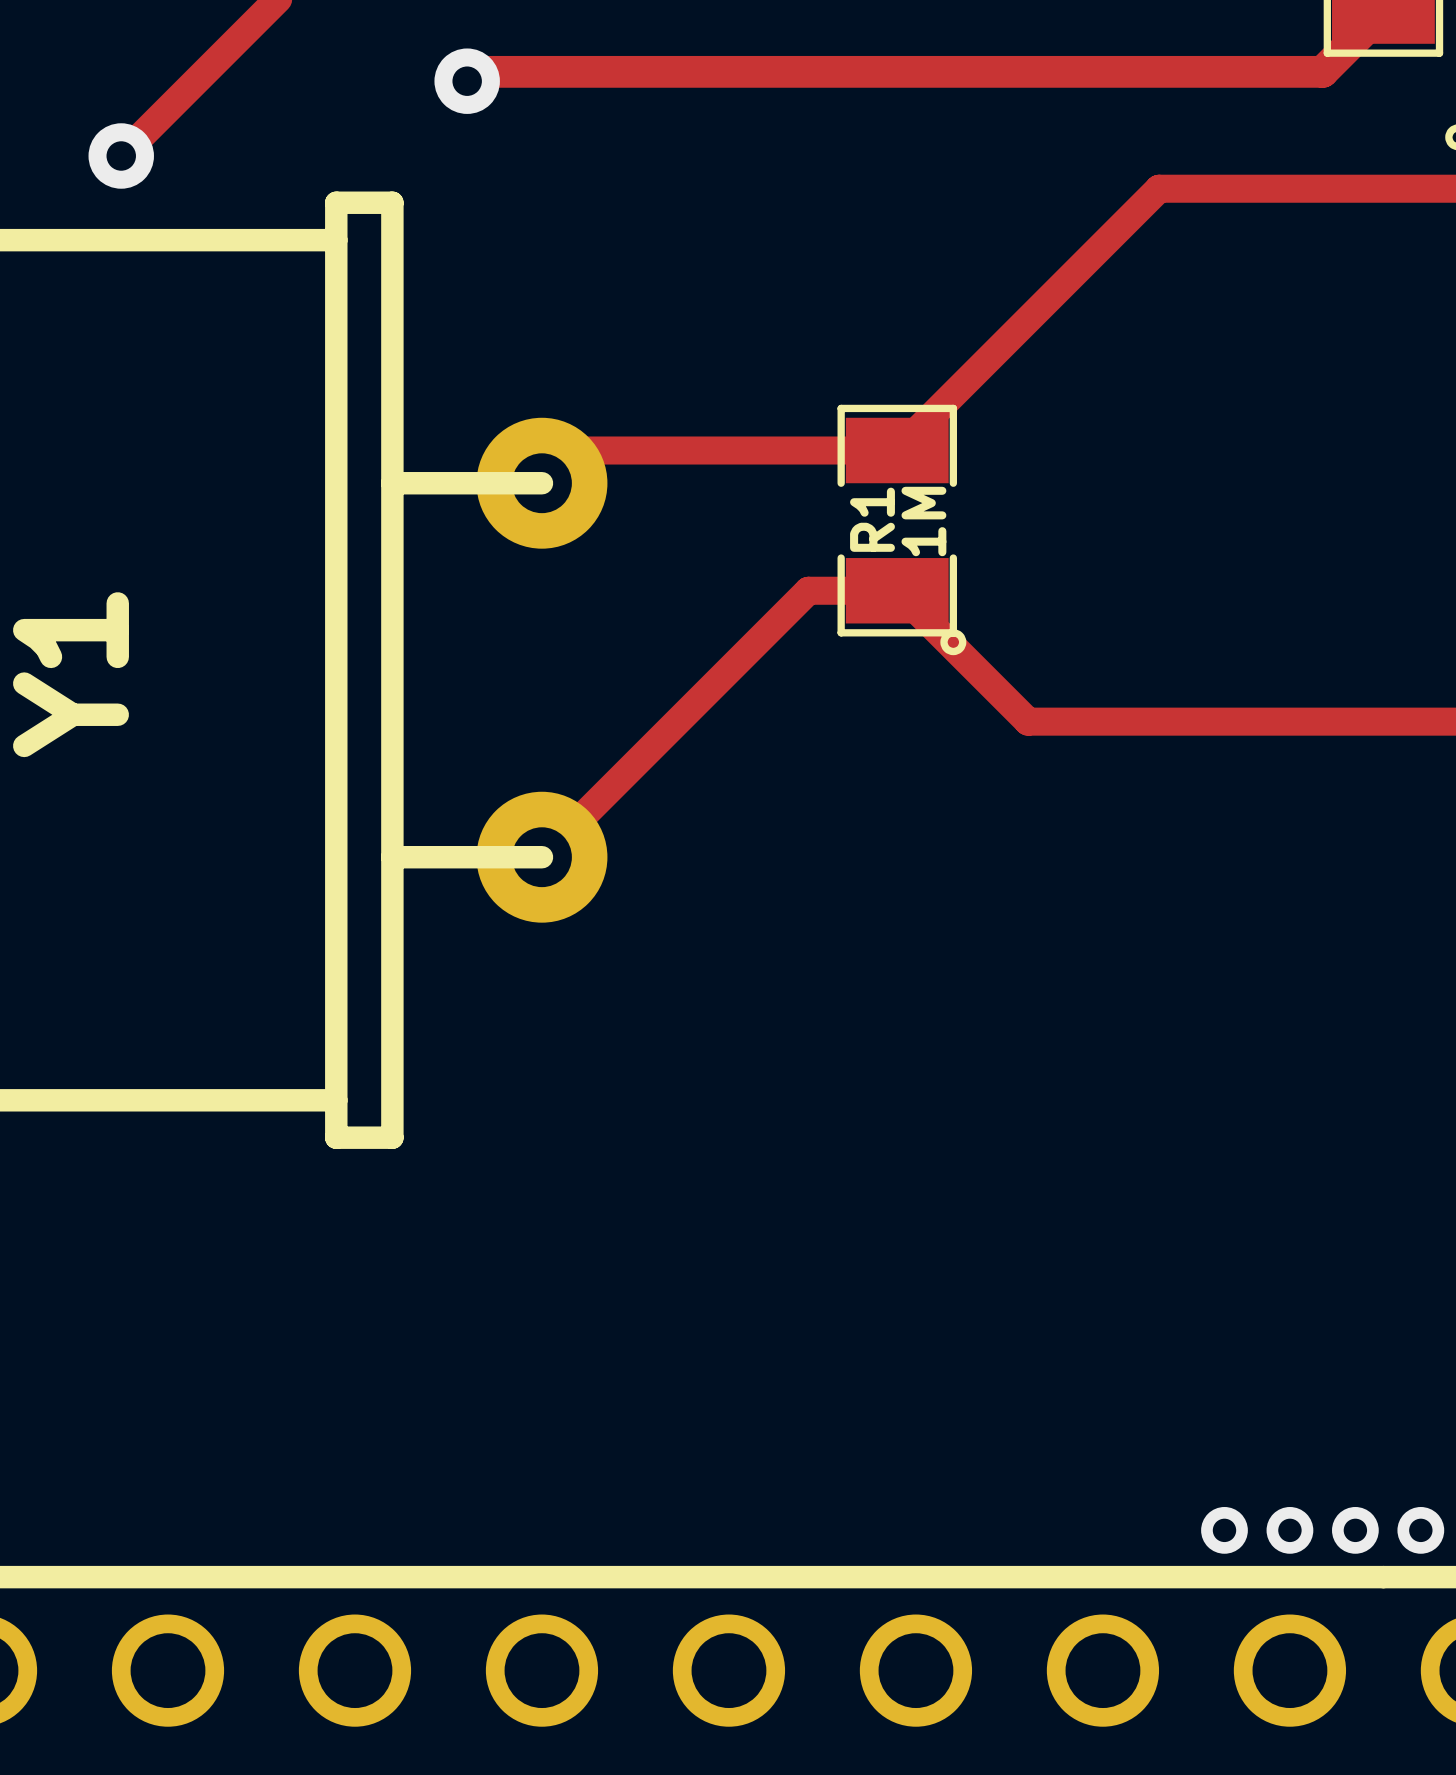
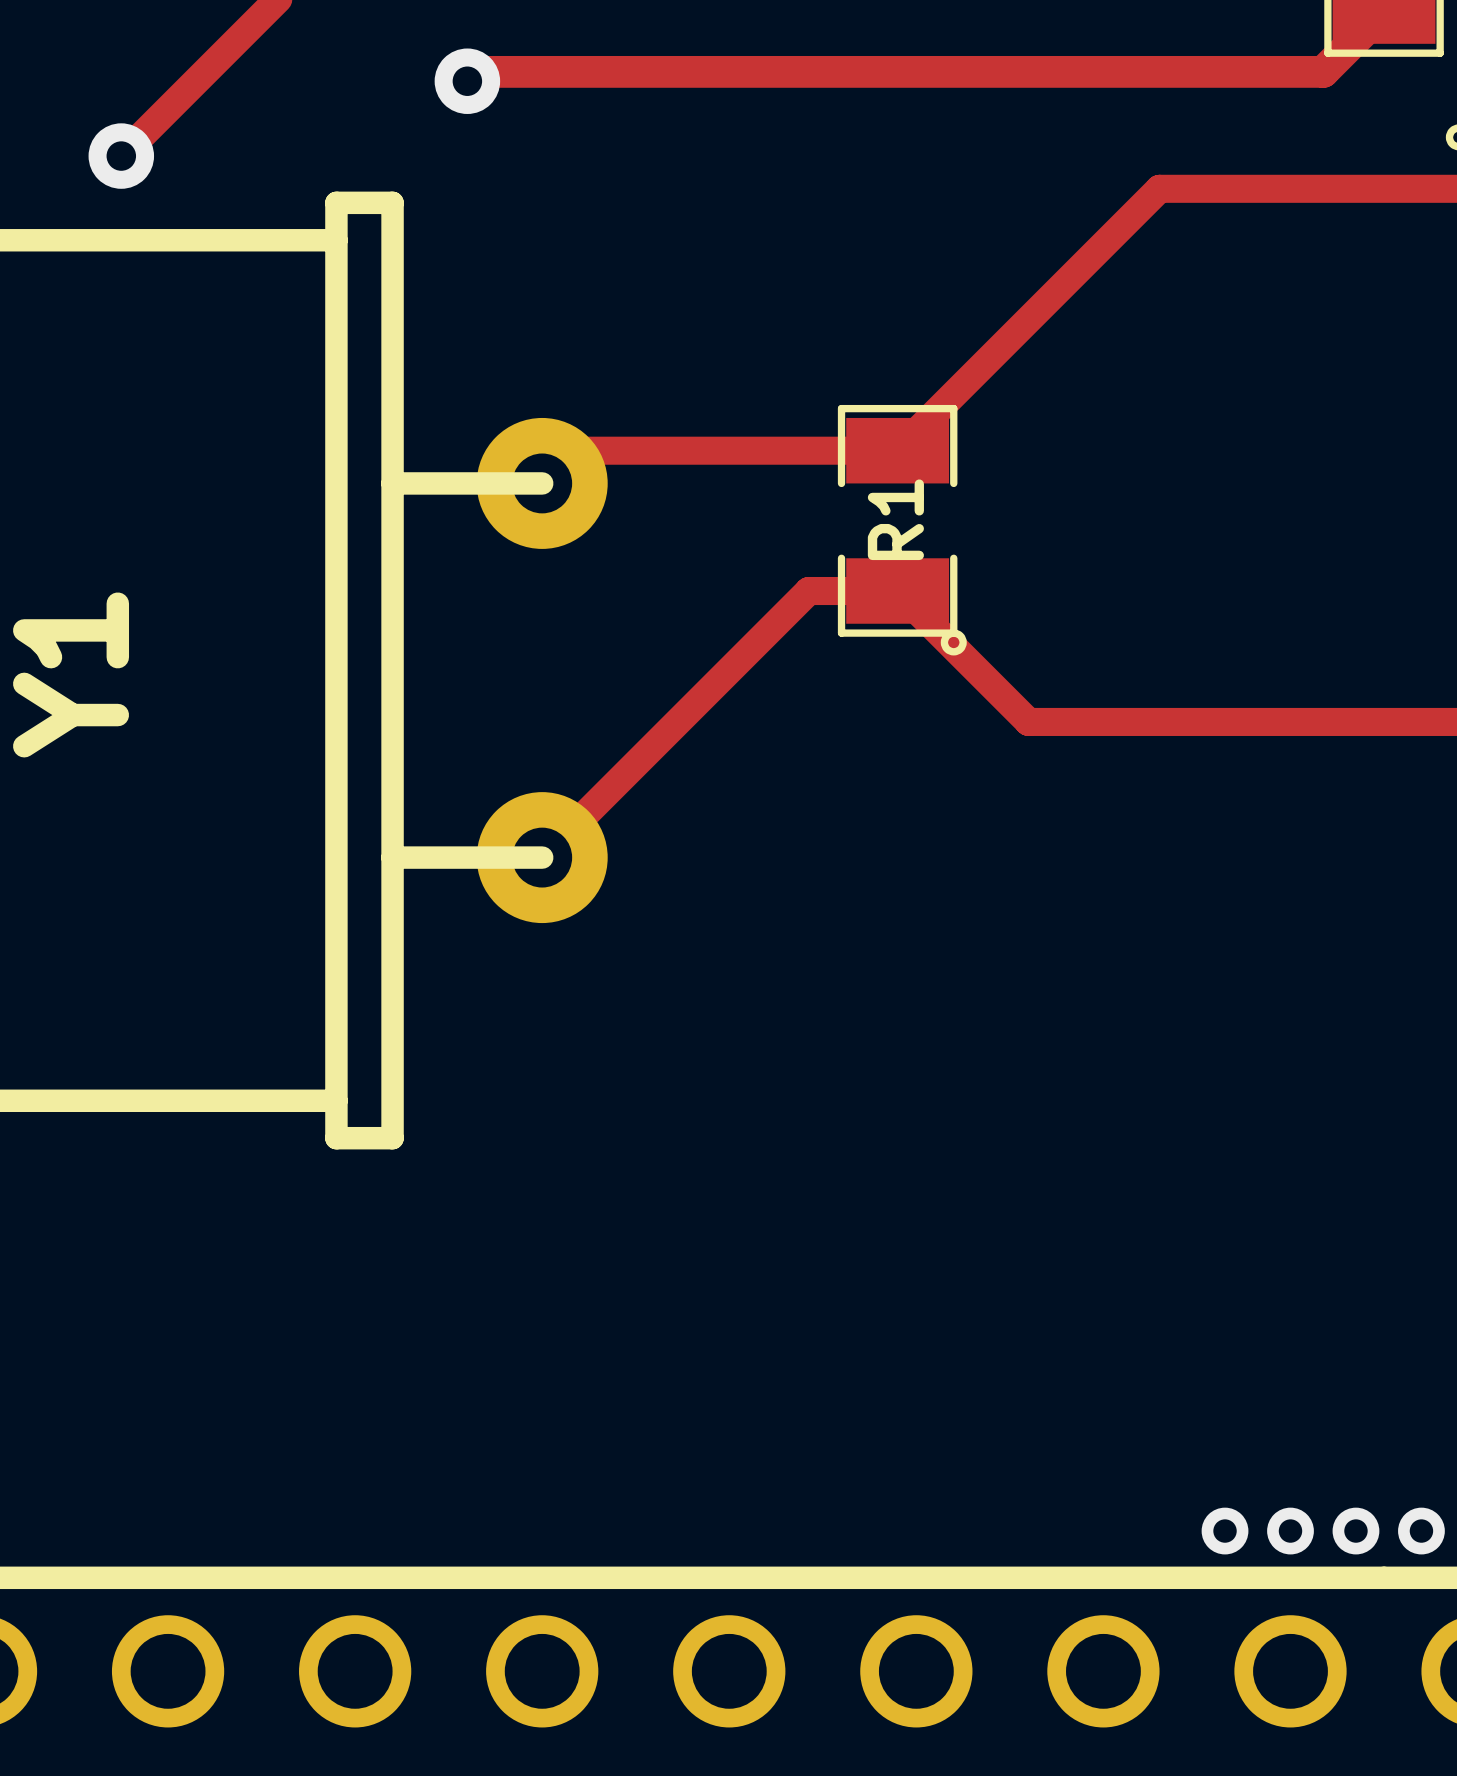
R1 name position: R1 (872, 519) -> R1 (895, 519)
R1 value: 1M (923, 521) -> none

